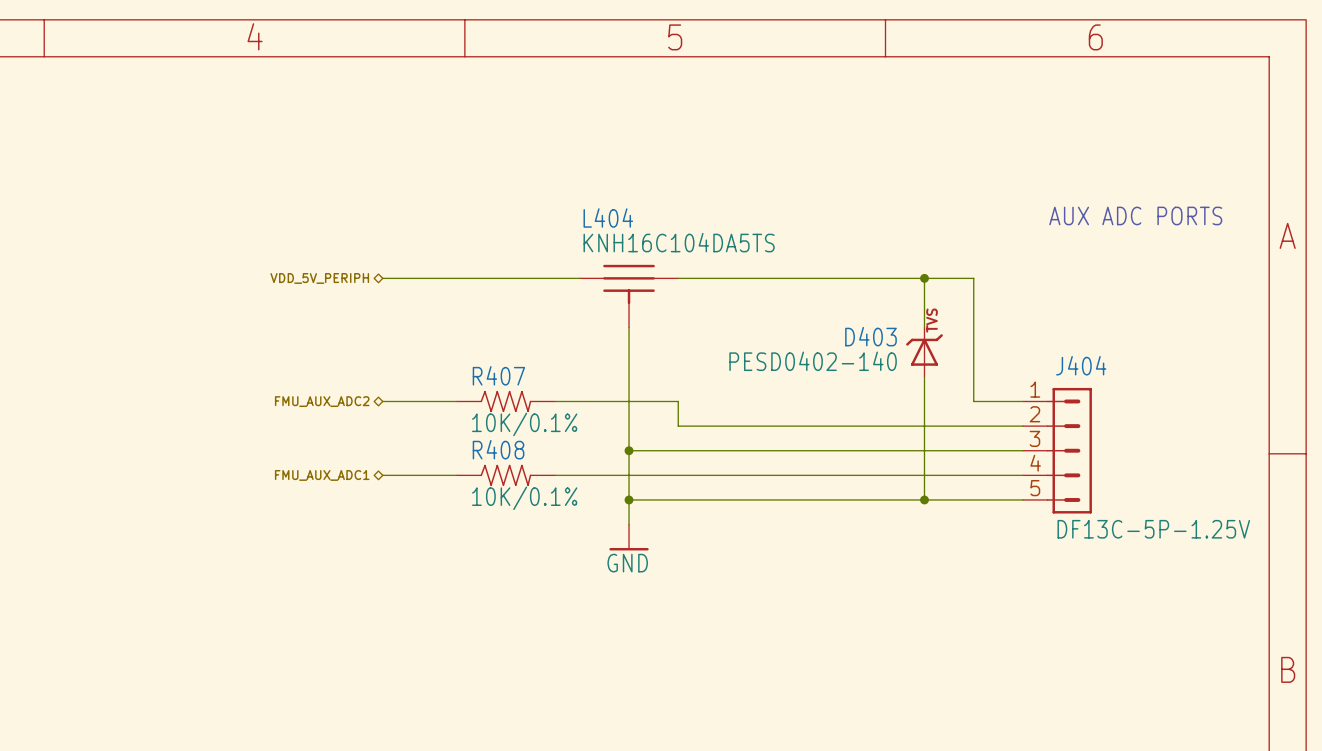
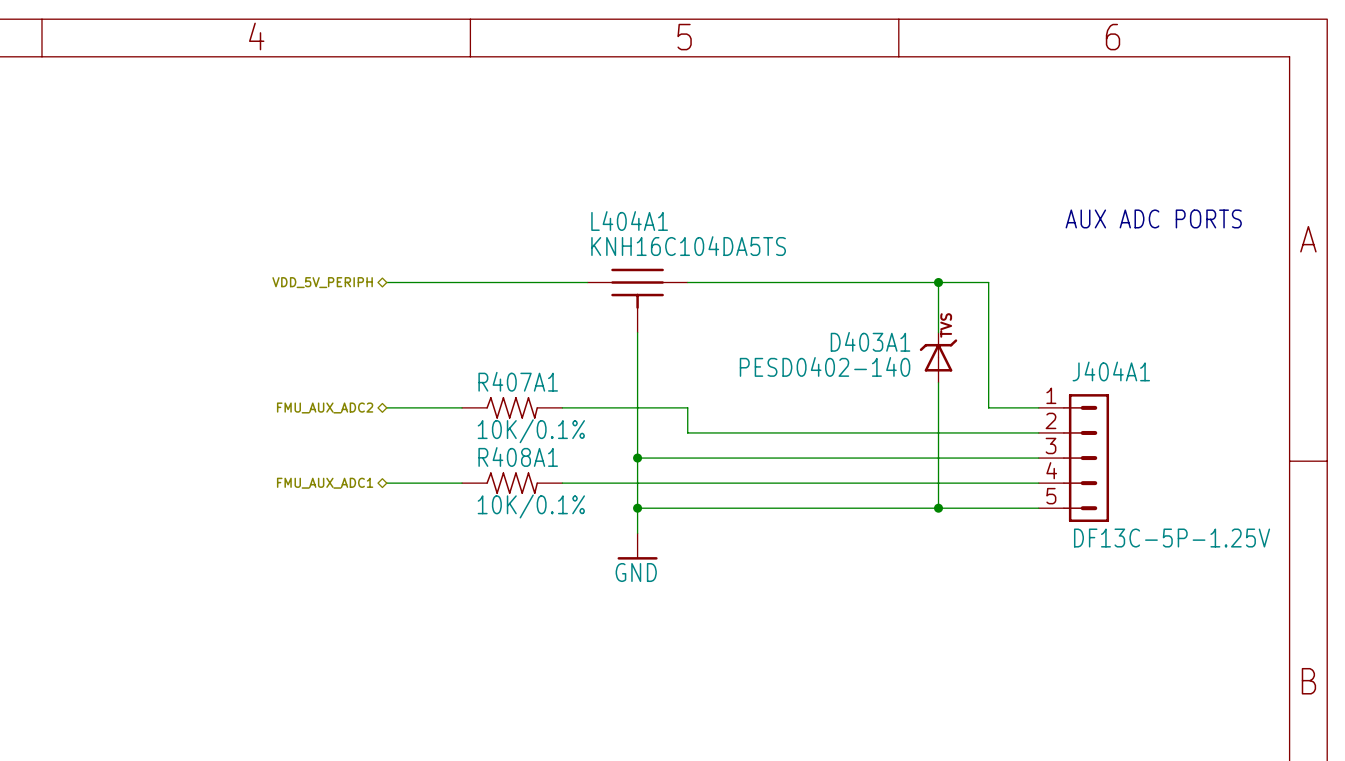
L404 name: L404 (608, 217) -> L404A1 (629, 221)
D403 name: D403 (870, 336) -> D403A1 (870, 341)
J404 name: J404 (1081, 365) -> J404A1 (1111, 371)
R407 name: R407 (498, 375) -> R407A1 (518, 381)
R408 name: R408 (498, 449) -> R408A1 (518, 456)

